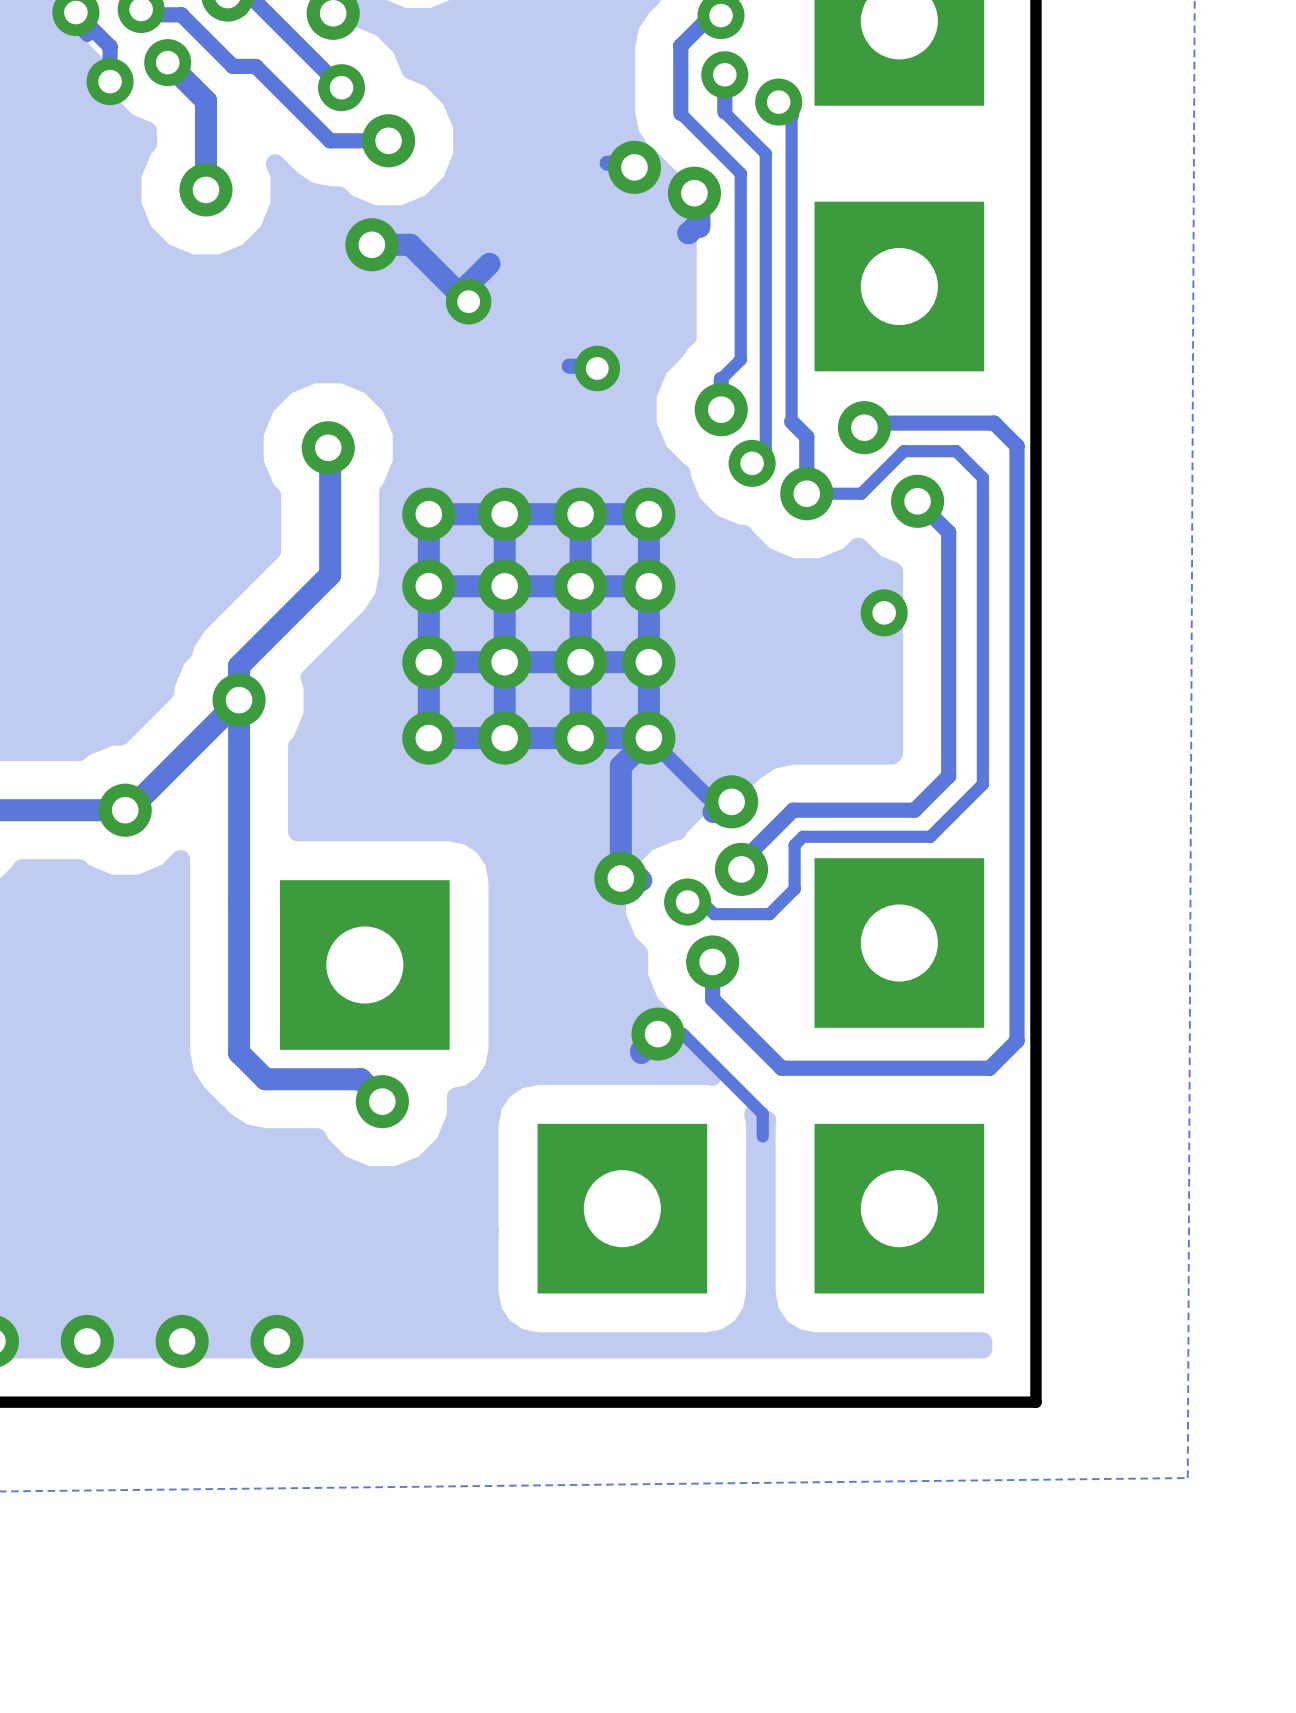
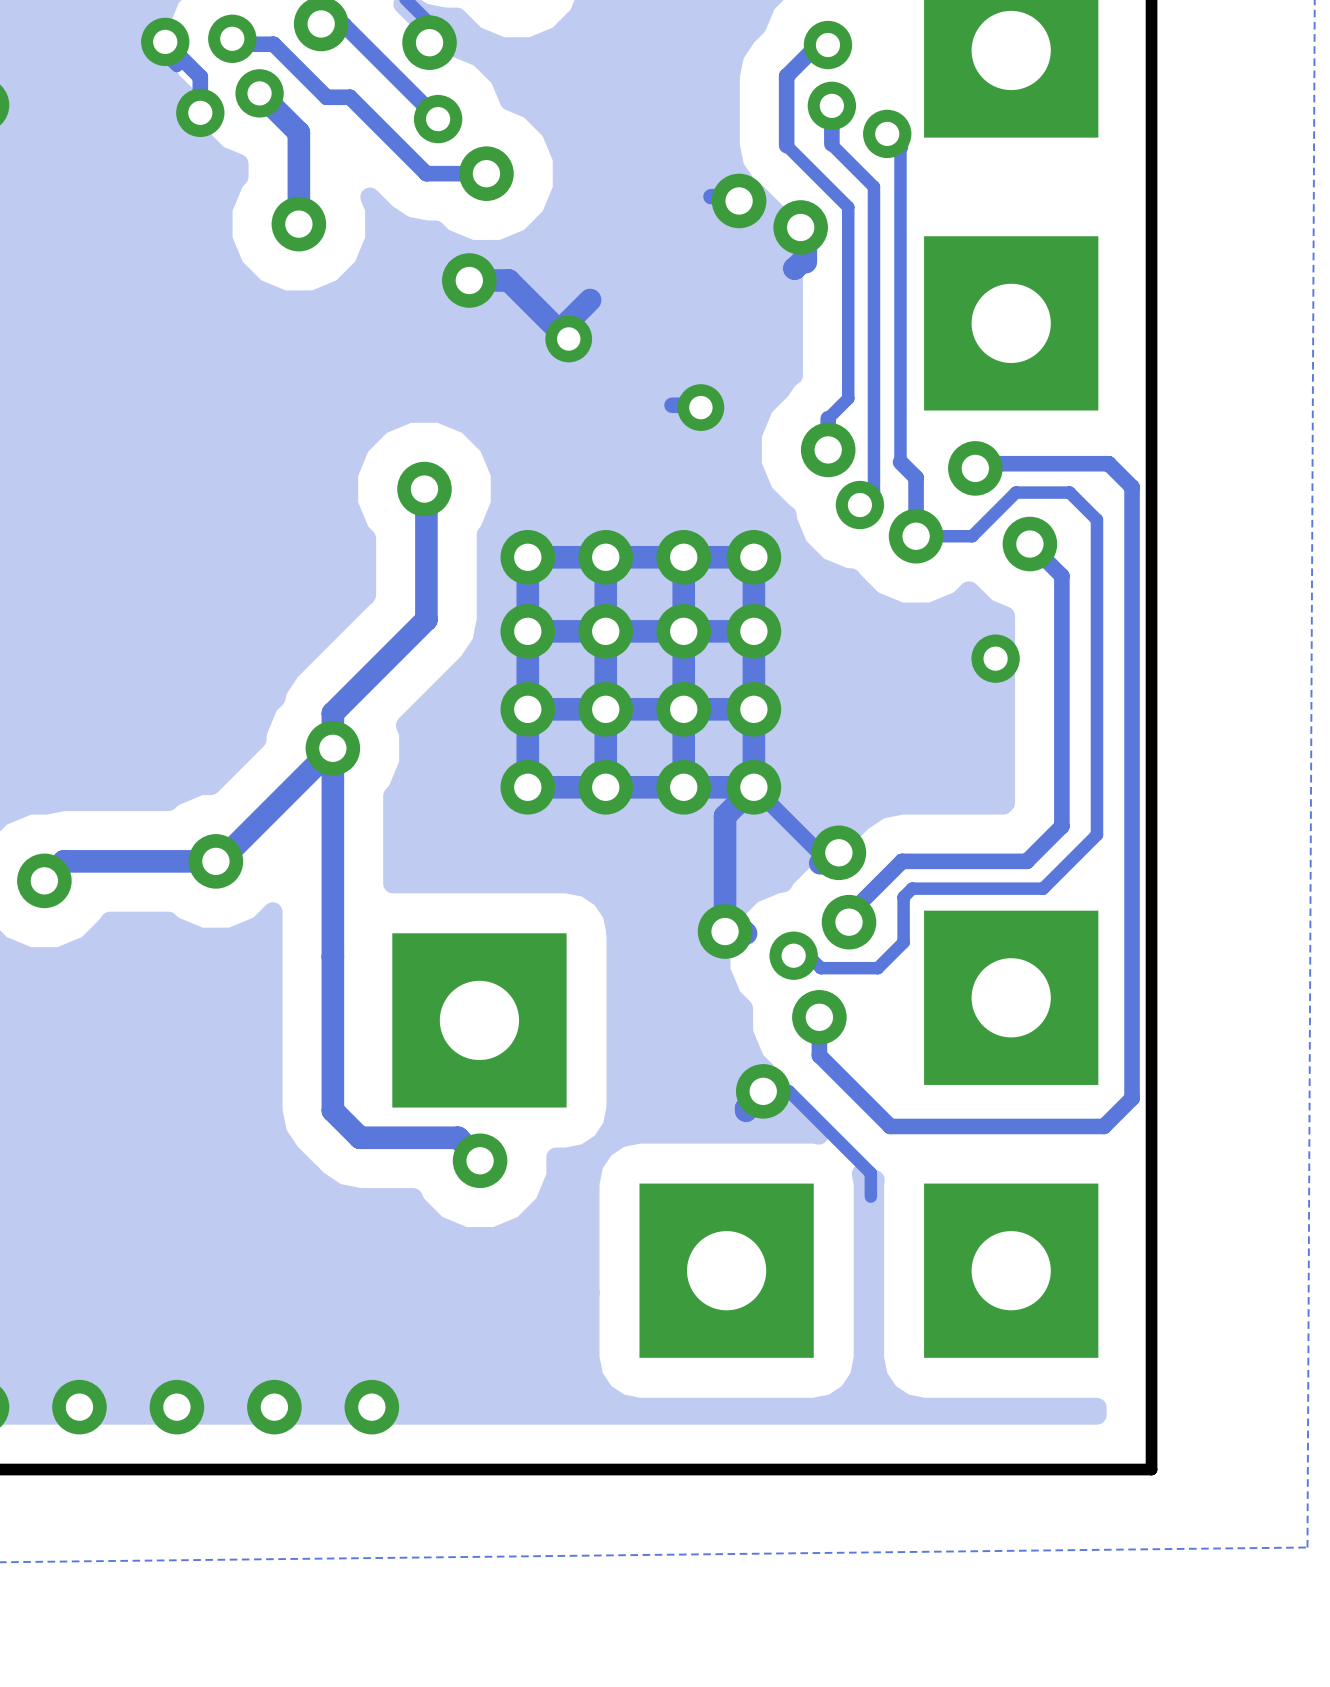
part position: (364, 965) -> (479, 1020)

